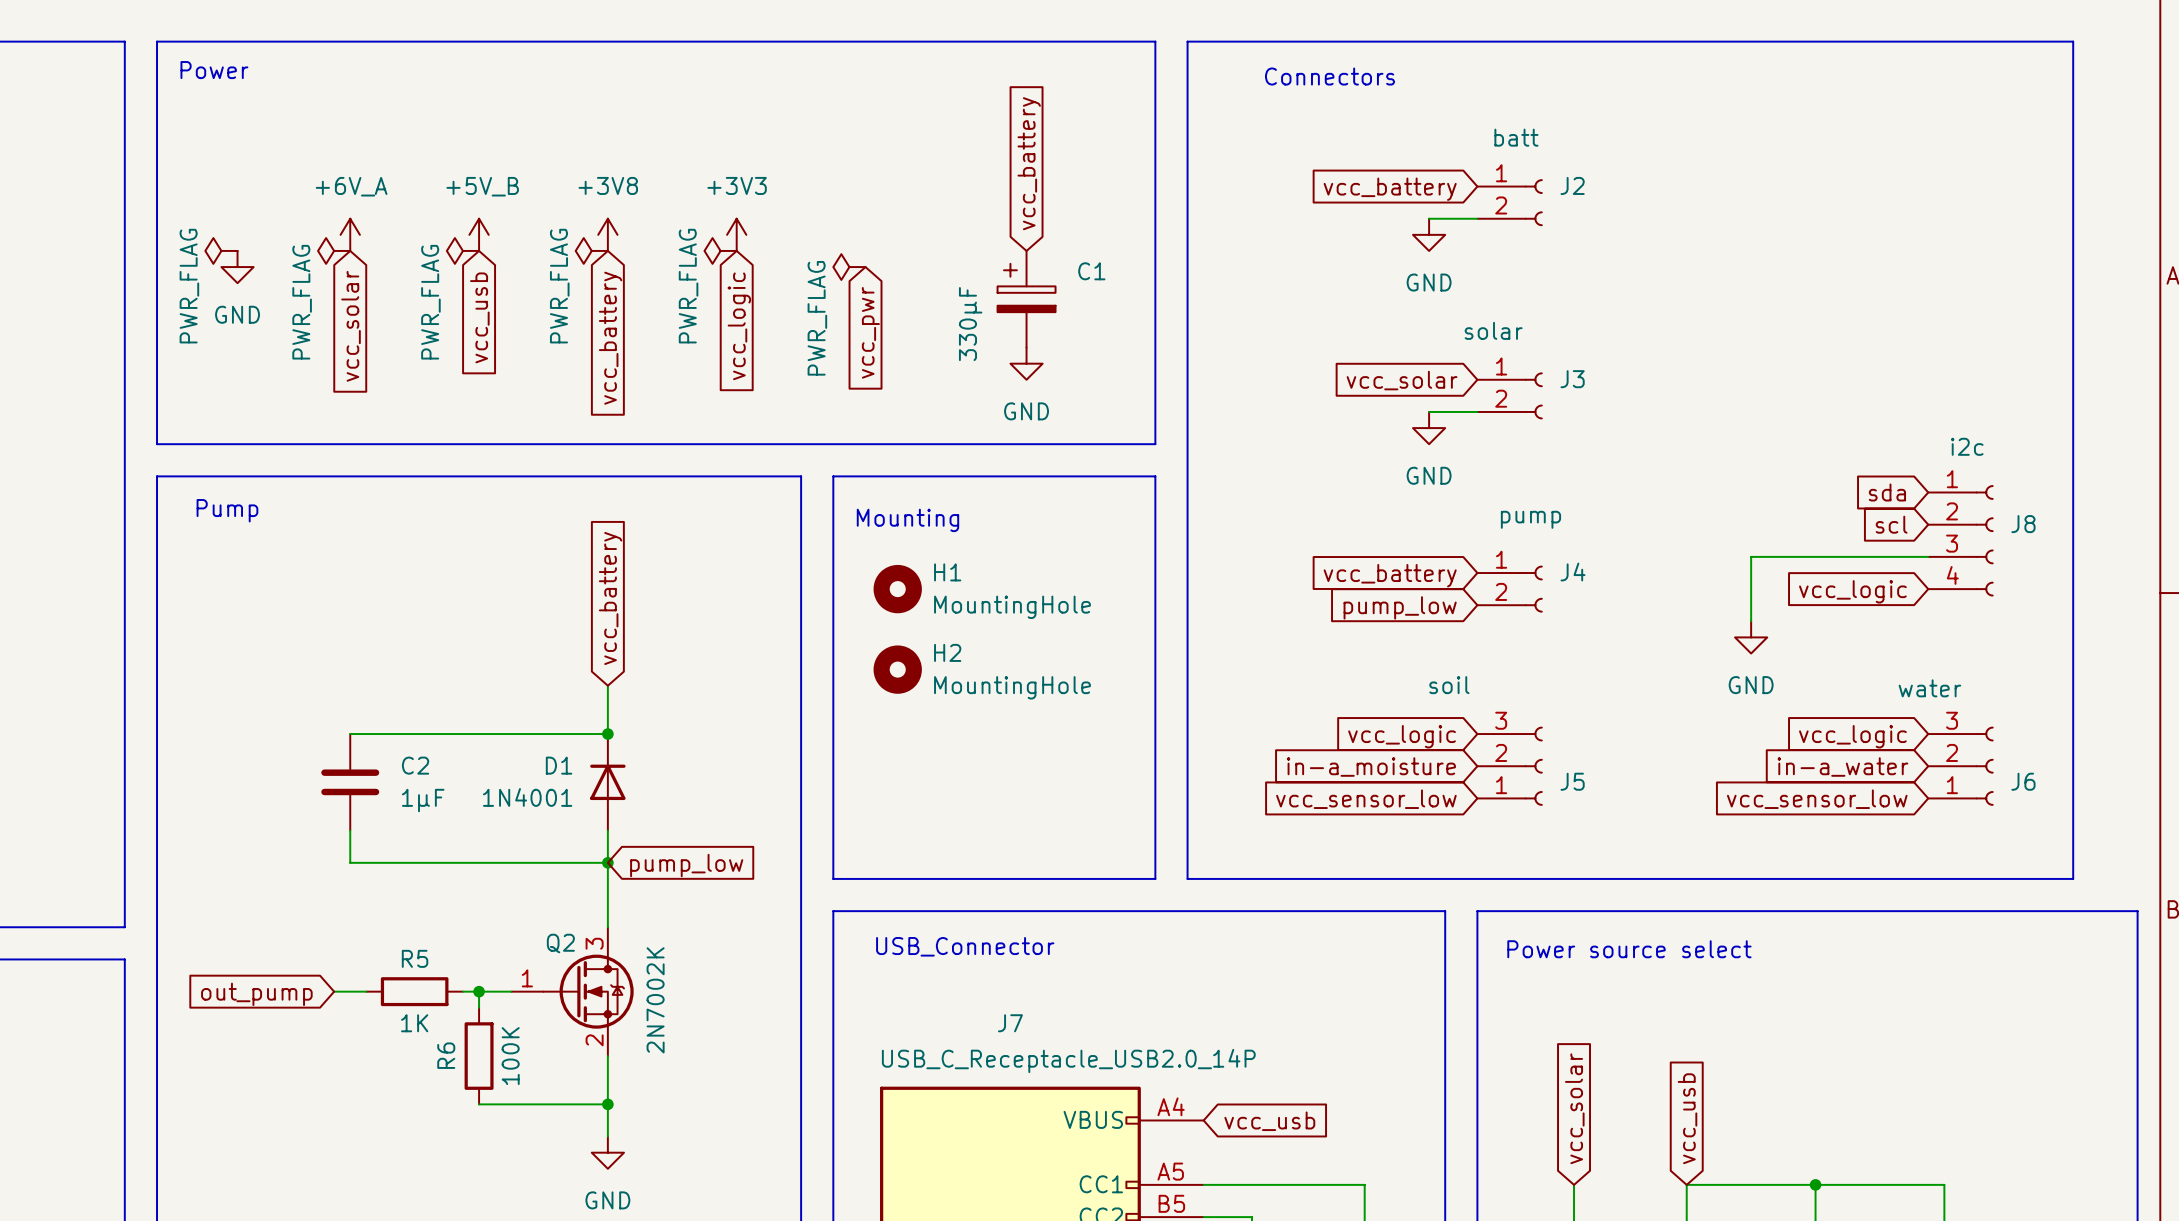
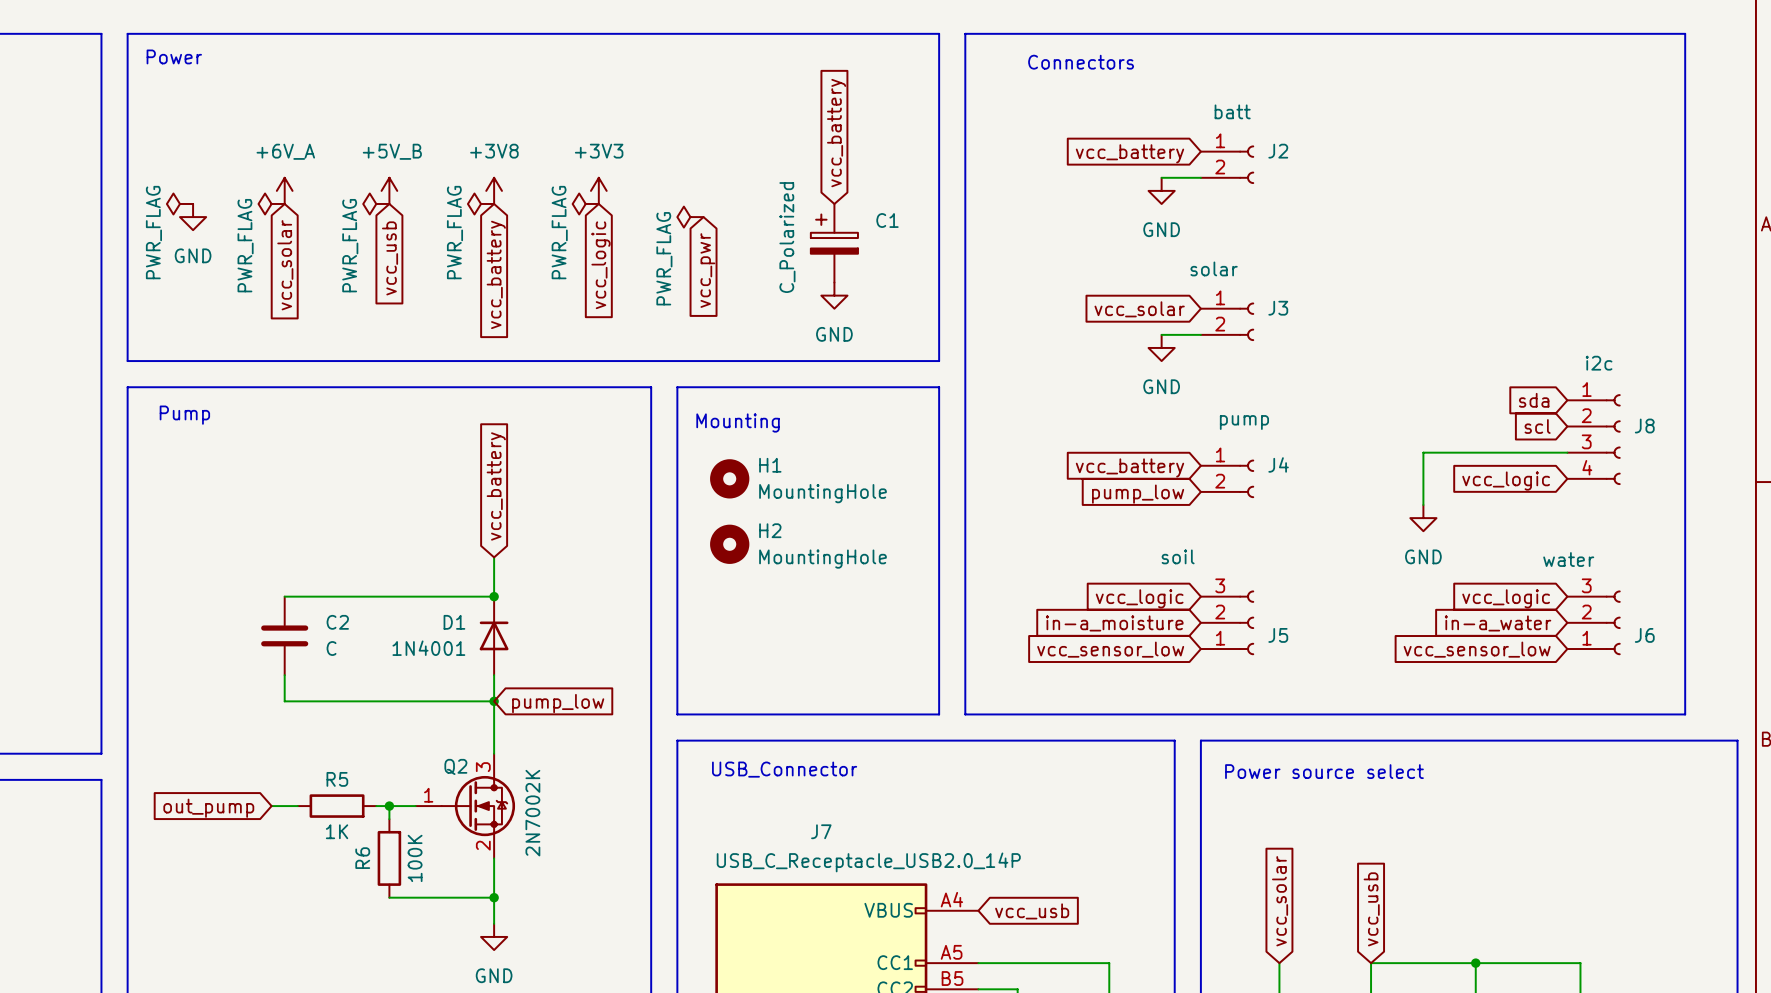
C1 value: 330µF (970, 324) -> C_Polarized (787, 237)
C2 value: 1µF (423, 800) -> C (331, 648)

